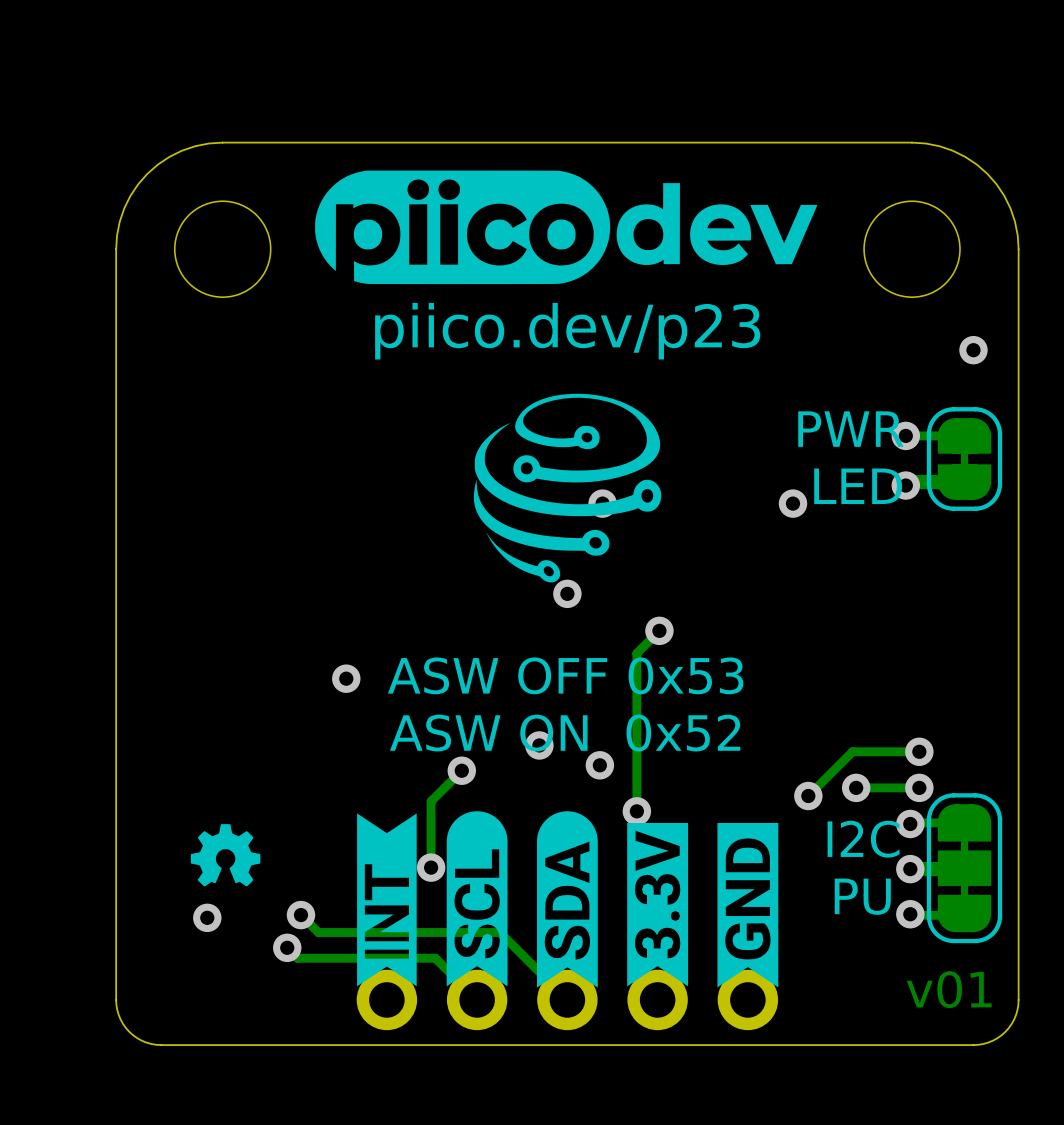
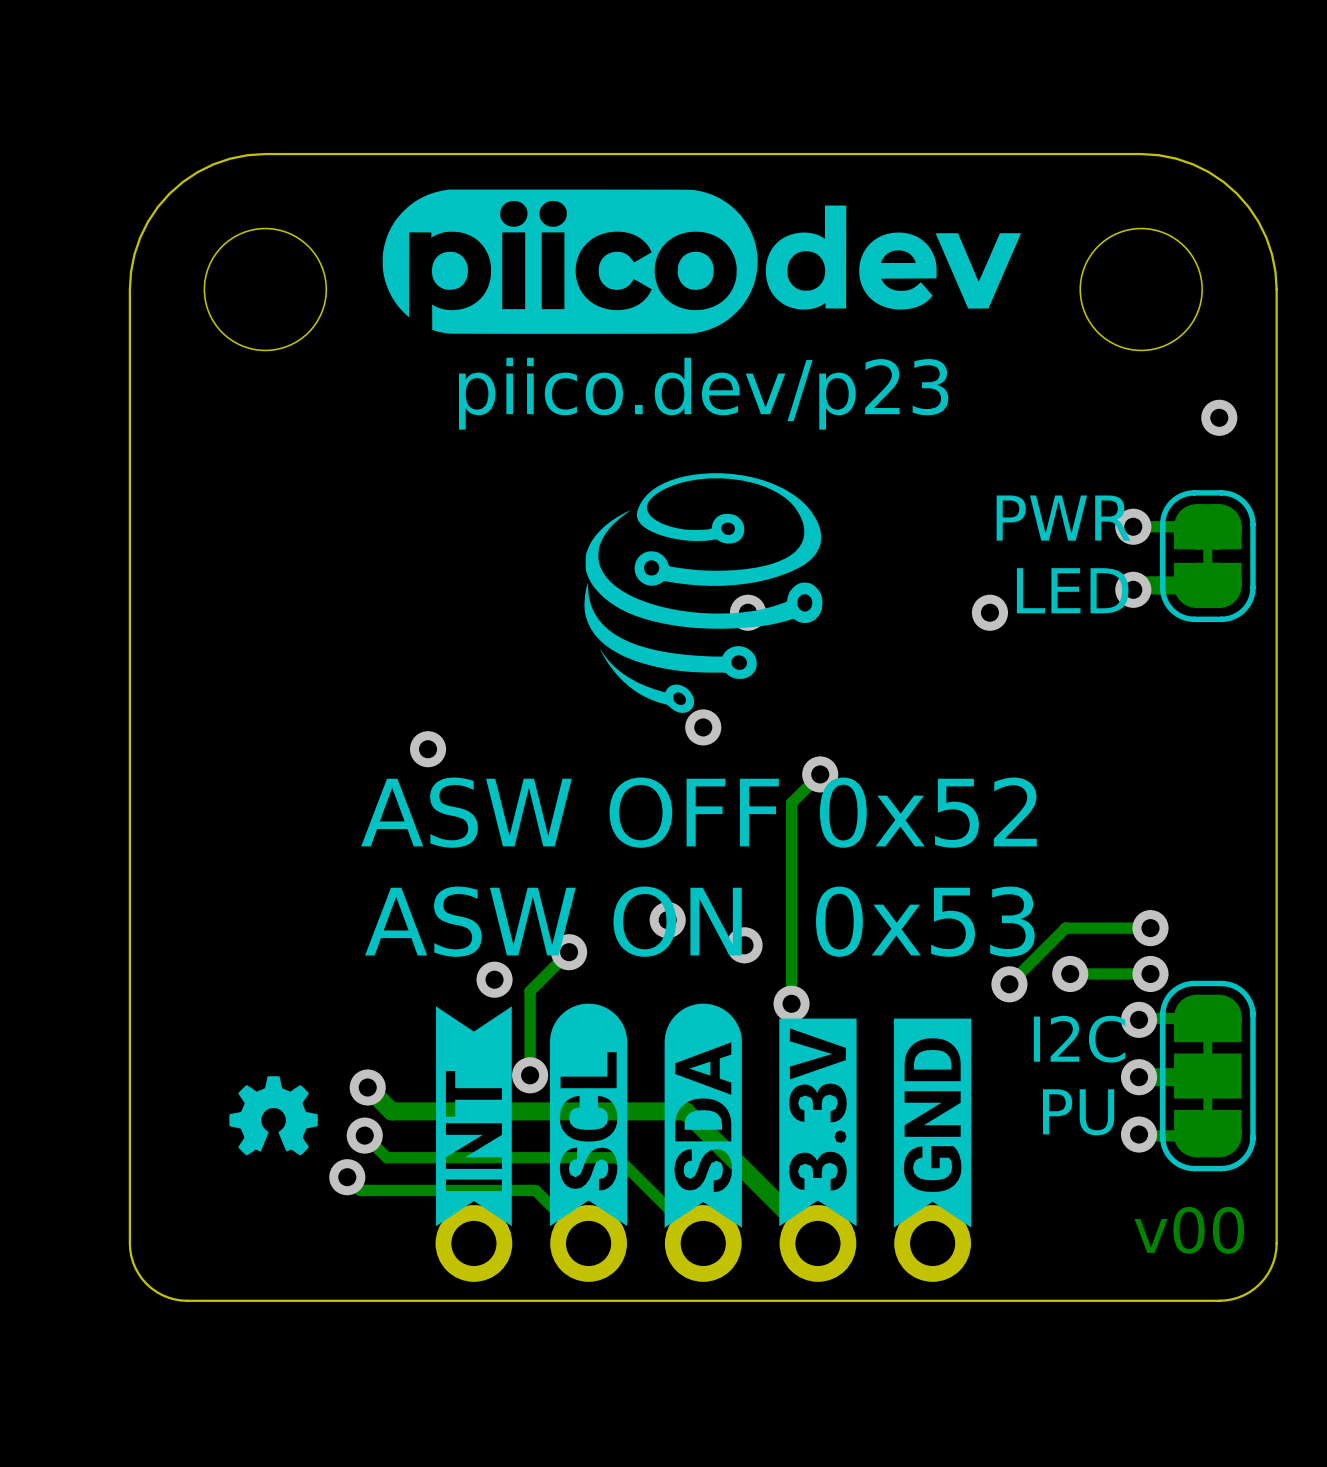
via: none -> (428, 749)
text: ASW OFF 0x53 (565, 675) -> ASW OFF 0x52 (698, 812)
via: (346, 678) -> none
text: ASW ON 0x52 (565, 733) -> ASW ON 0x53 (699, 921)
via: none -> (494, 979)
drawing position: (225, 855) -> (273, 1115)
track: none -> (367, 1087) (391, 1111) (685, 1111) (817, 1243)
via: none -> (367, 1087)
via: (207, 917) -> none
text: v01 (949, 989) -> v00 (1189, 1230)

